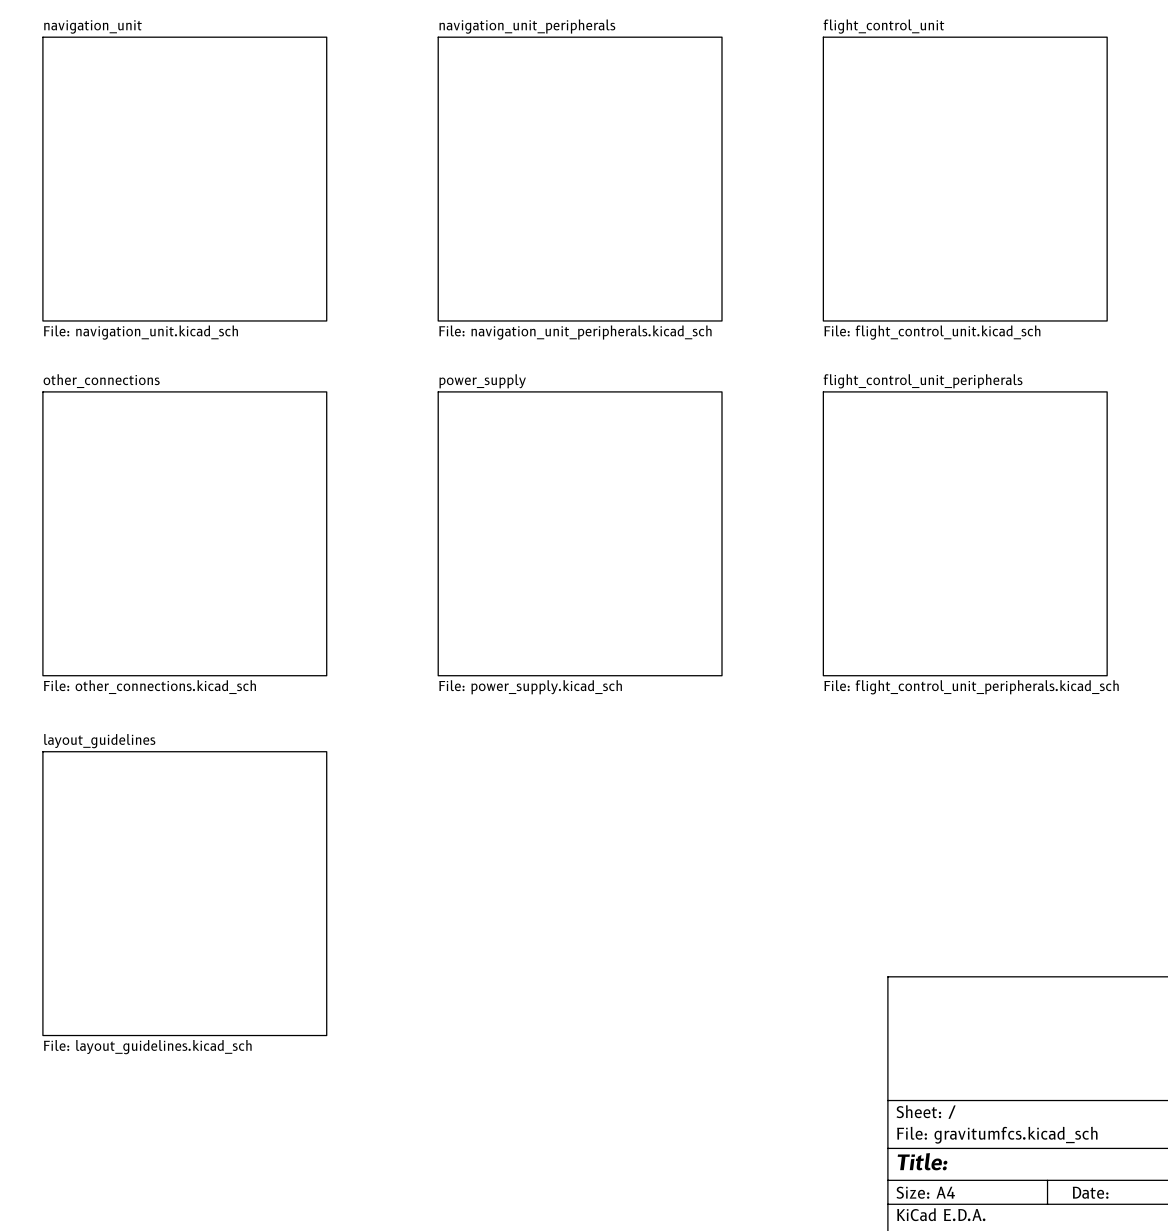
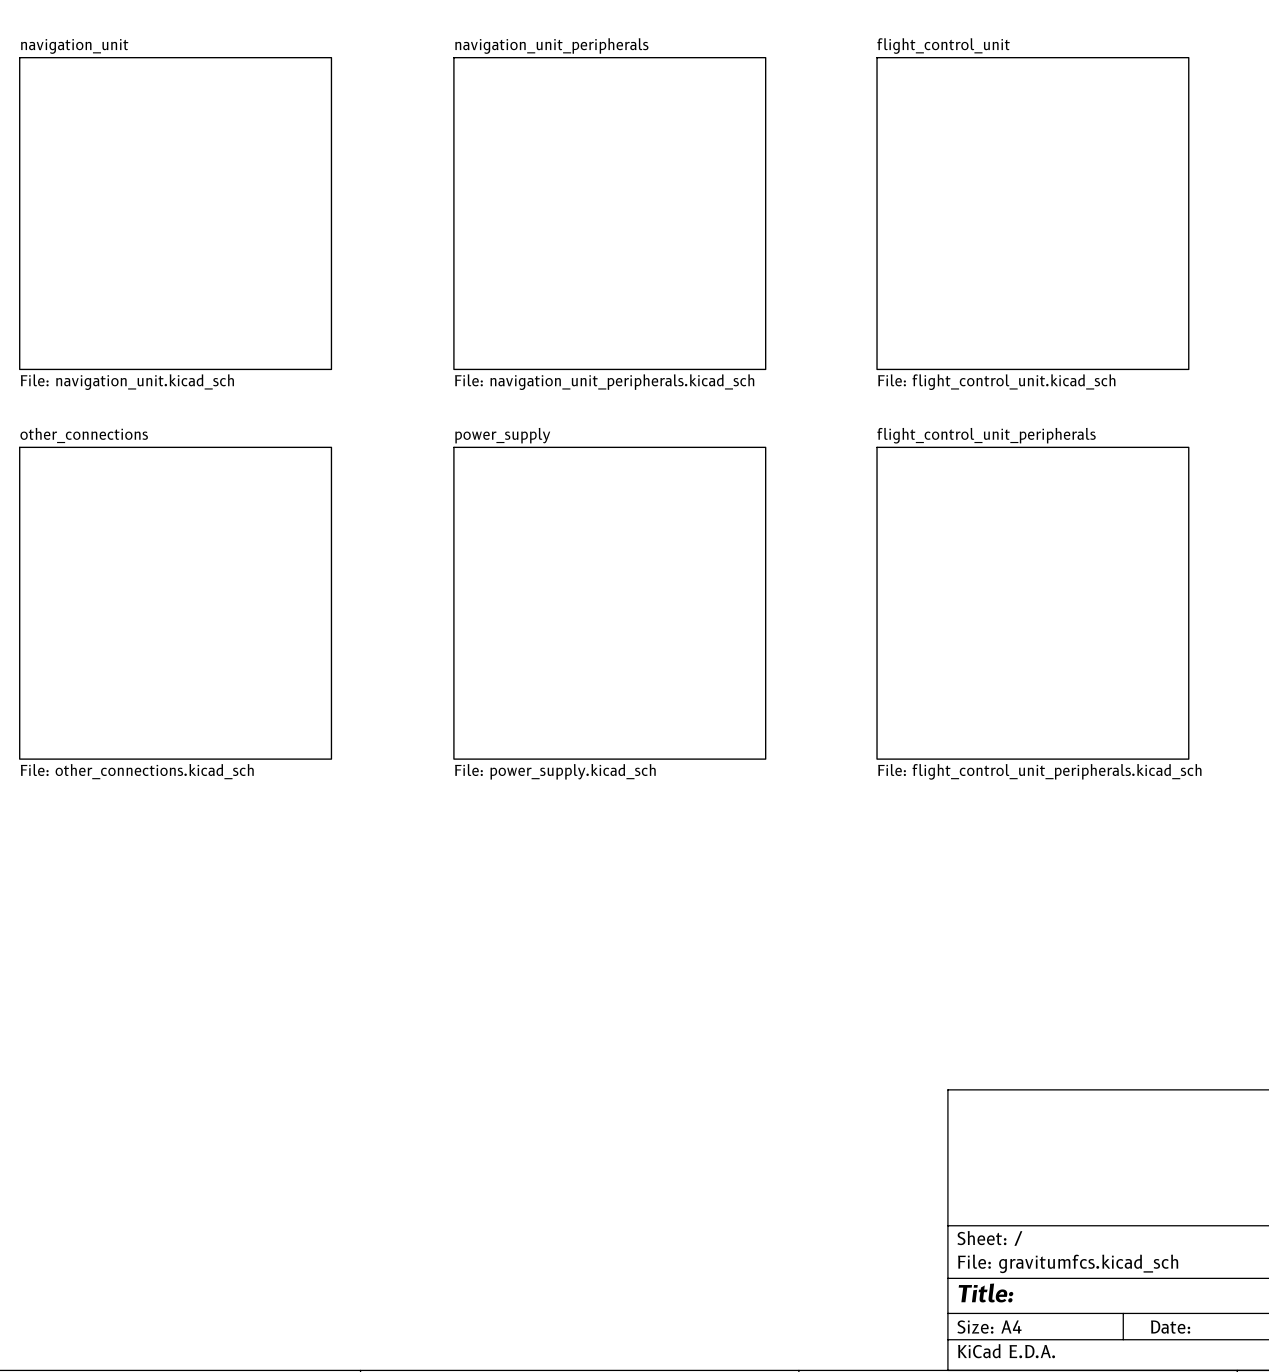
sheet layout_guidelines: File: layout_guidelines.kicad_sch (184, 893) -> none

